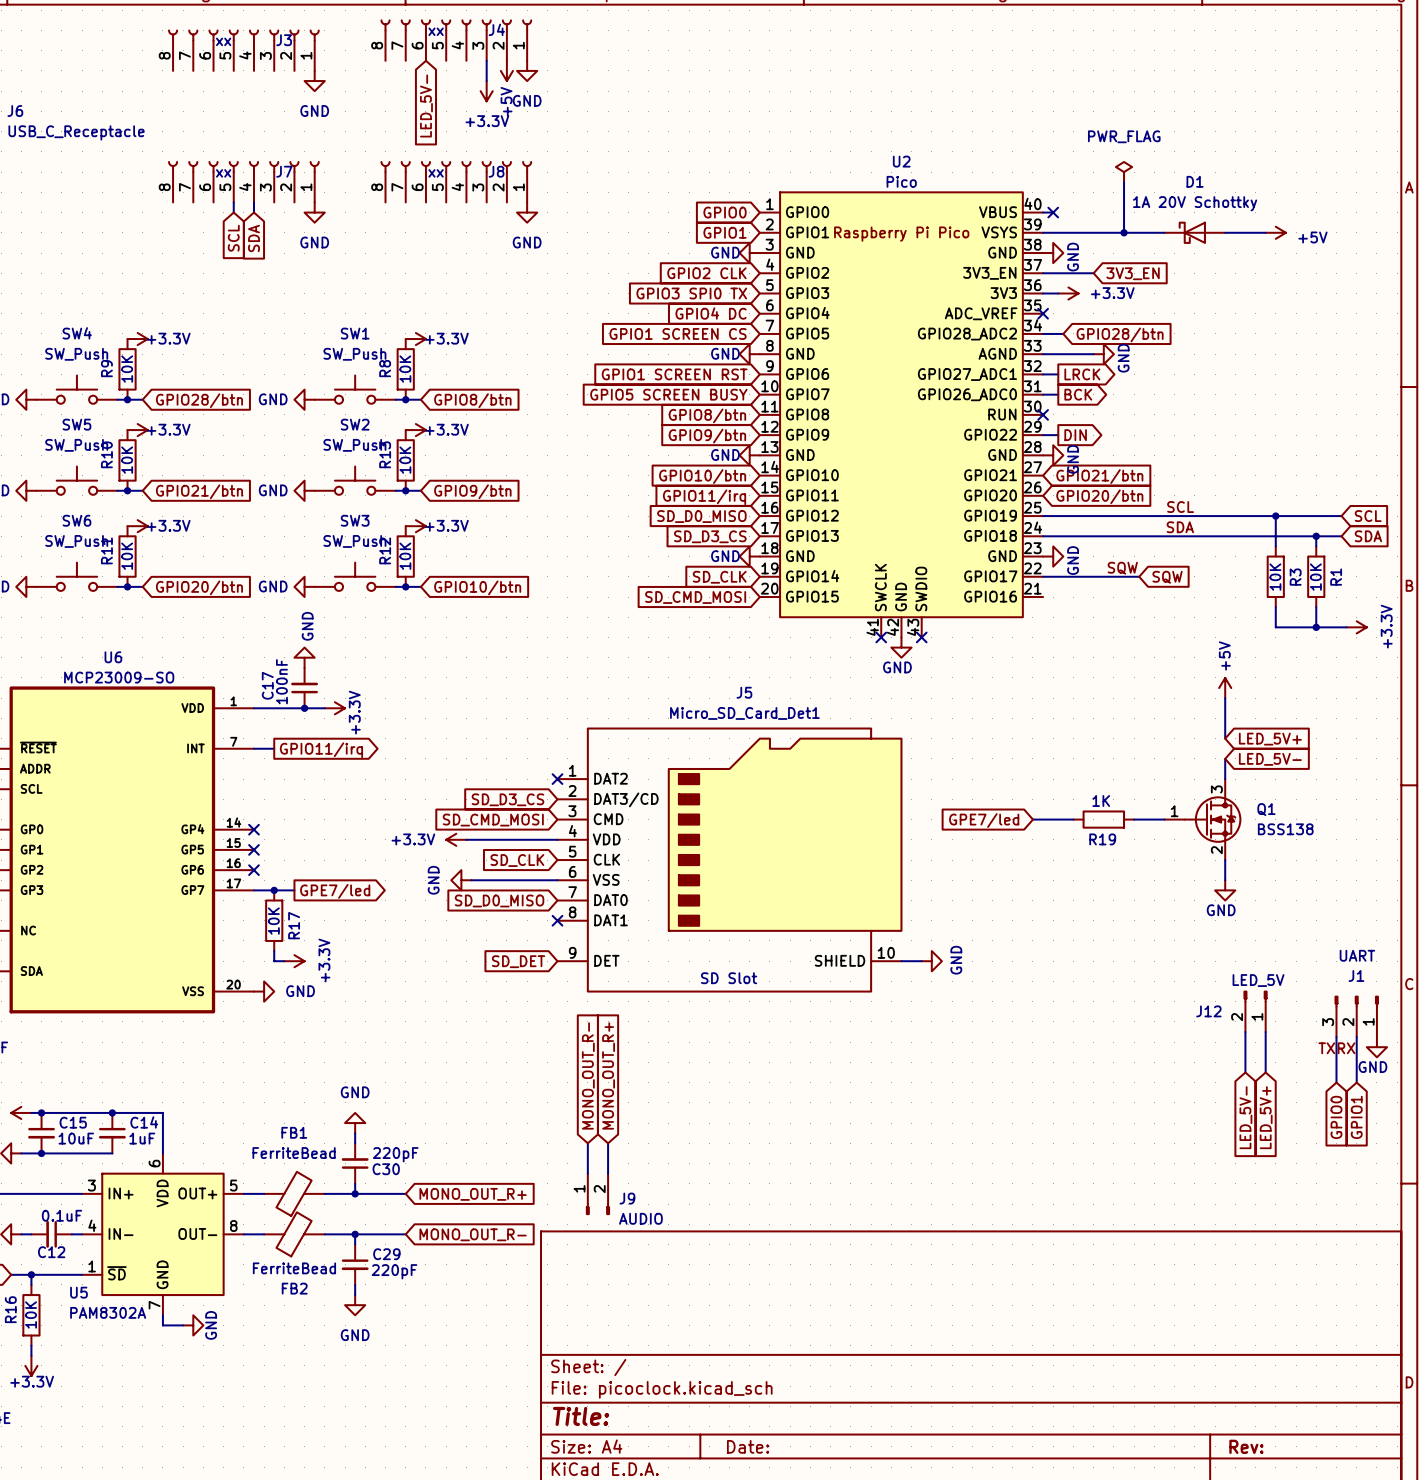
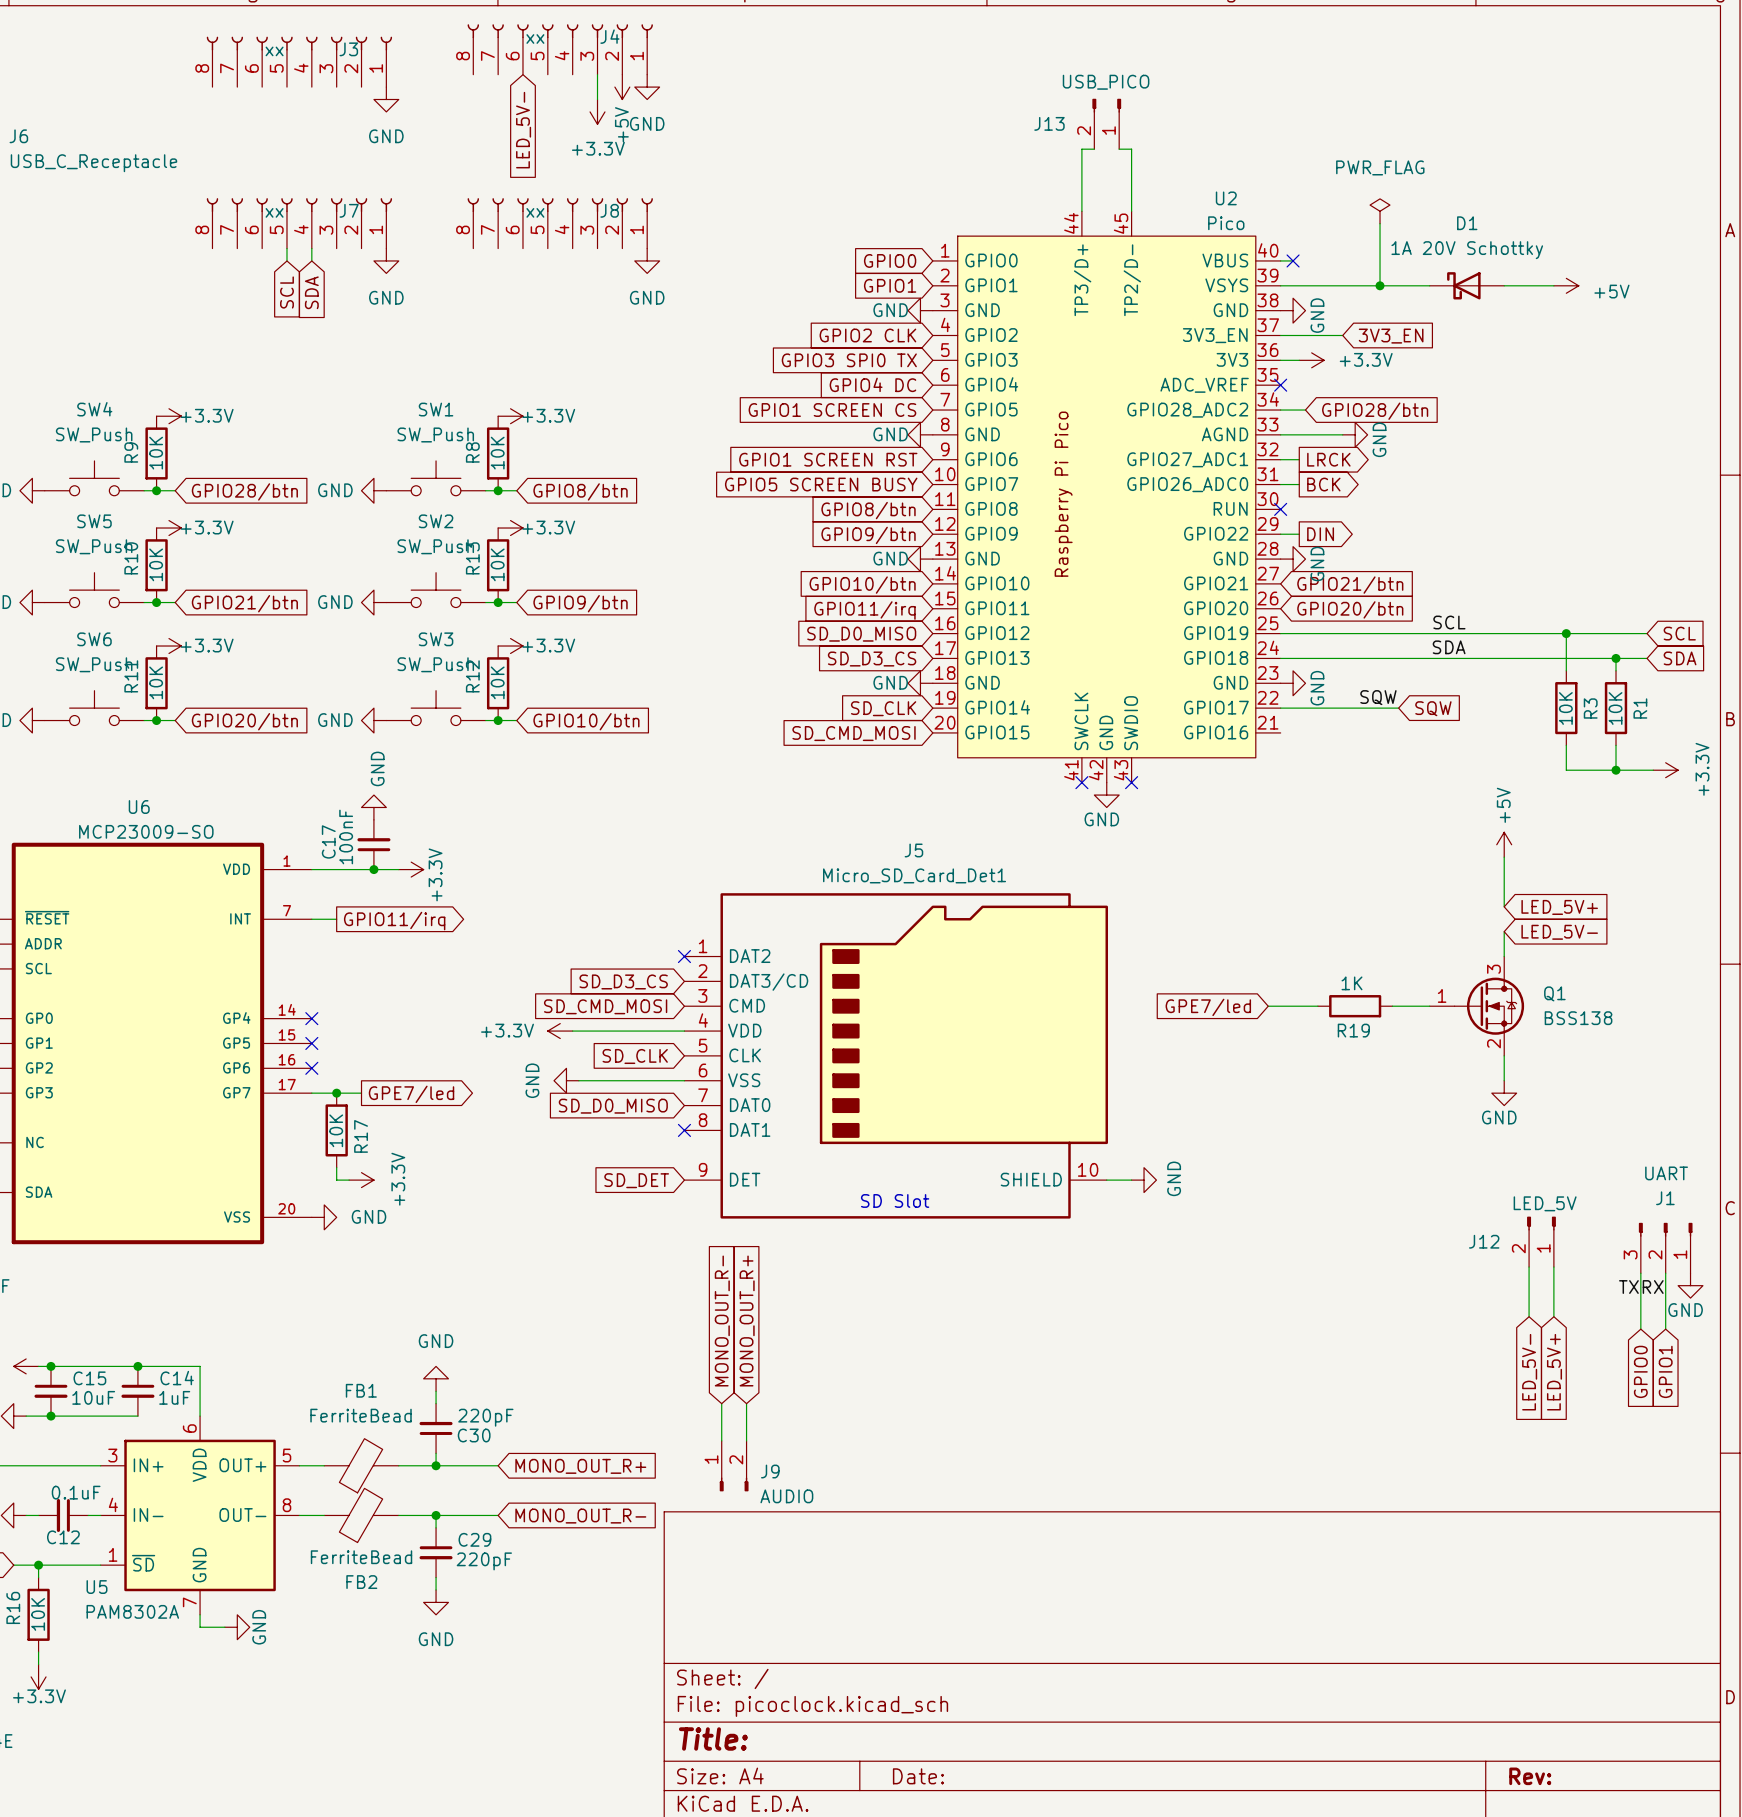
J13: none -> USB_PICO (1106, 123)
wire: none -> (1094, 149) (1081, 149) (1081, 211)
wire: none -> (1119, 149) (1131, 149) (1131, 211)
U2 name position: U2 (901, 161) -> U2 (1226, 198)
U2 value position: Pico (901, 181) -> Pico (1226, 223)
U2 symbol: [759, 192, 1044, 638] -> [932, 211, 1281, 783]

